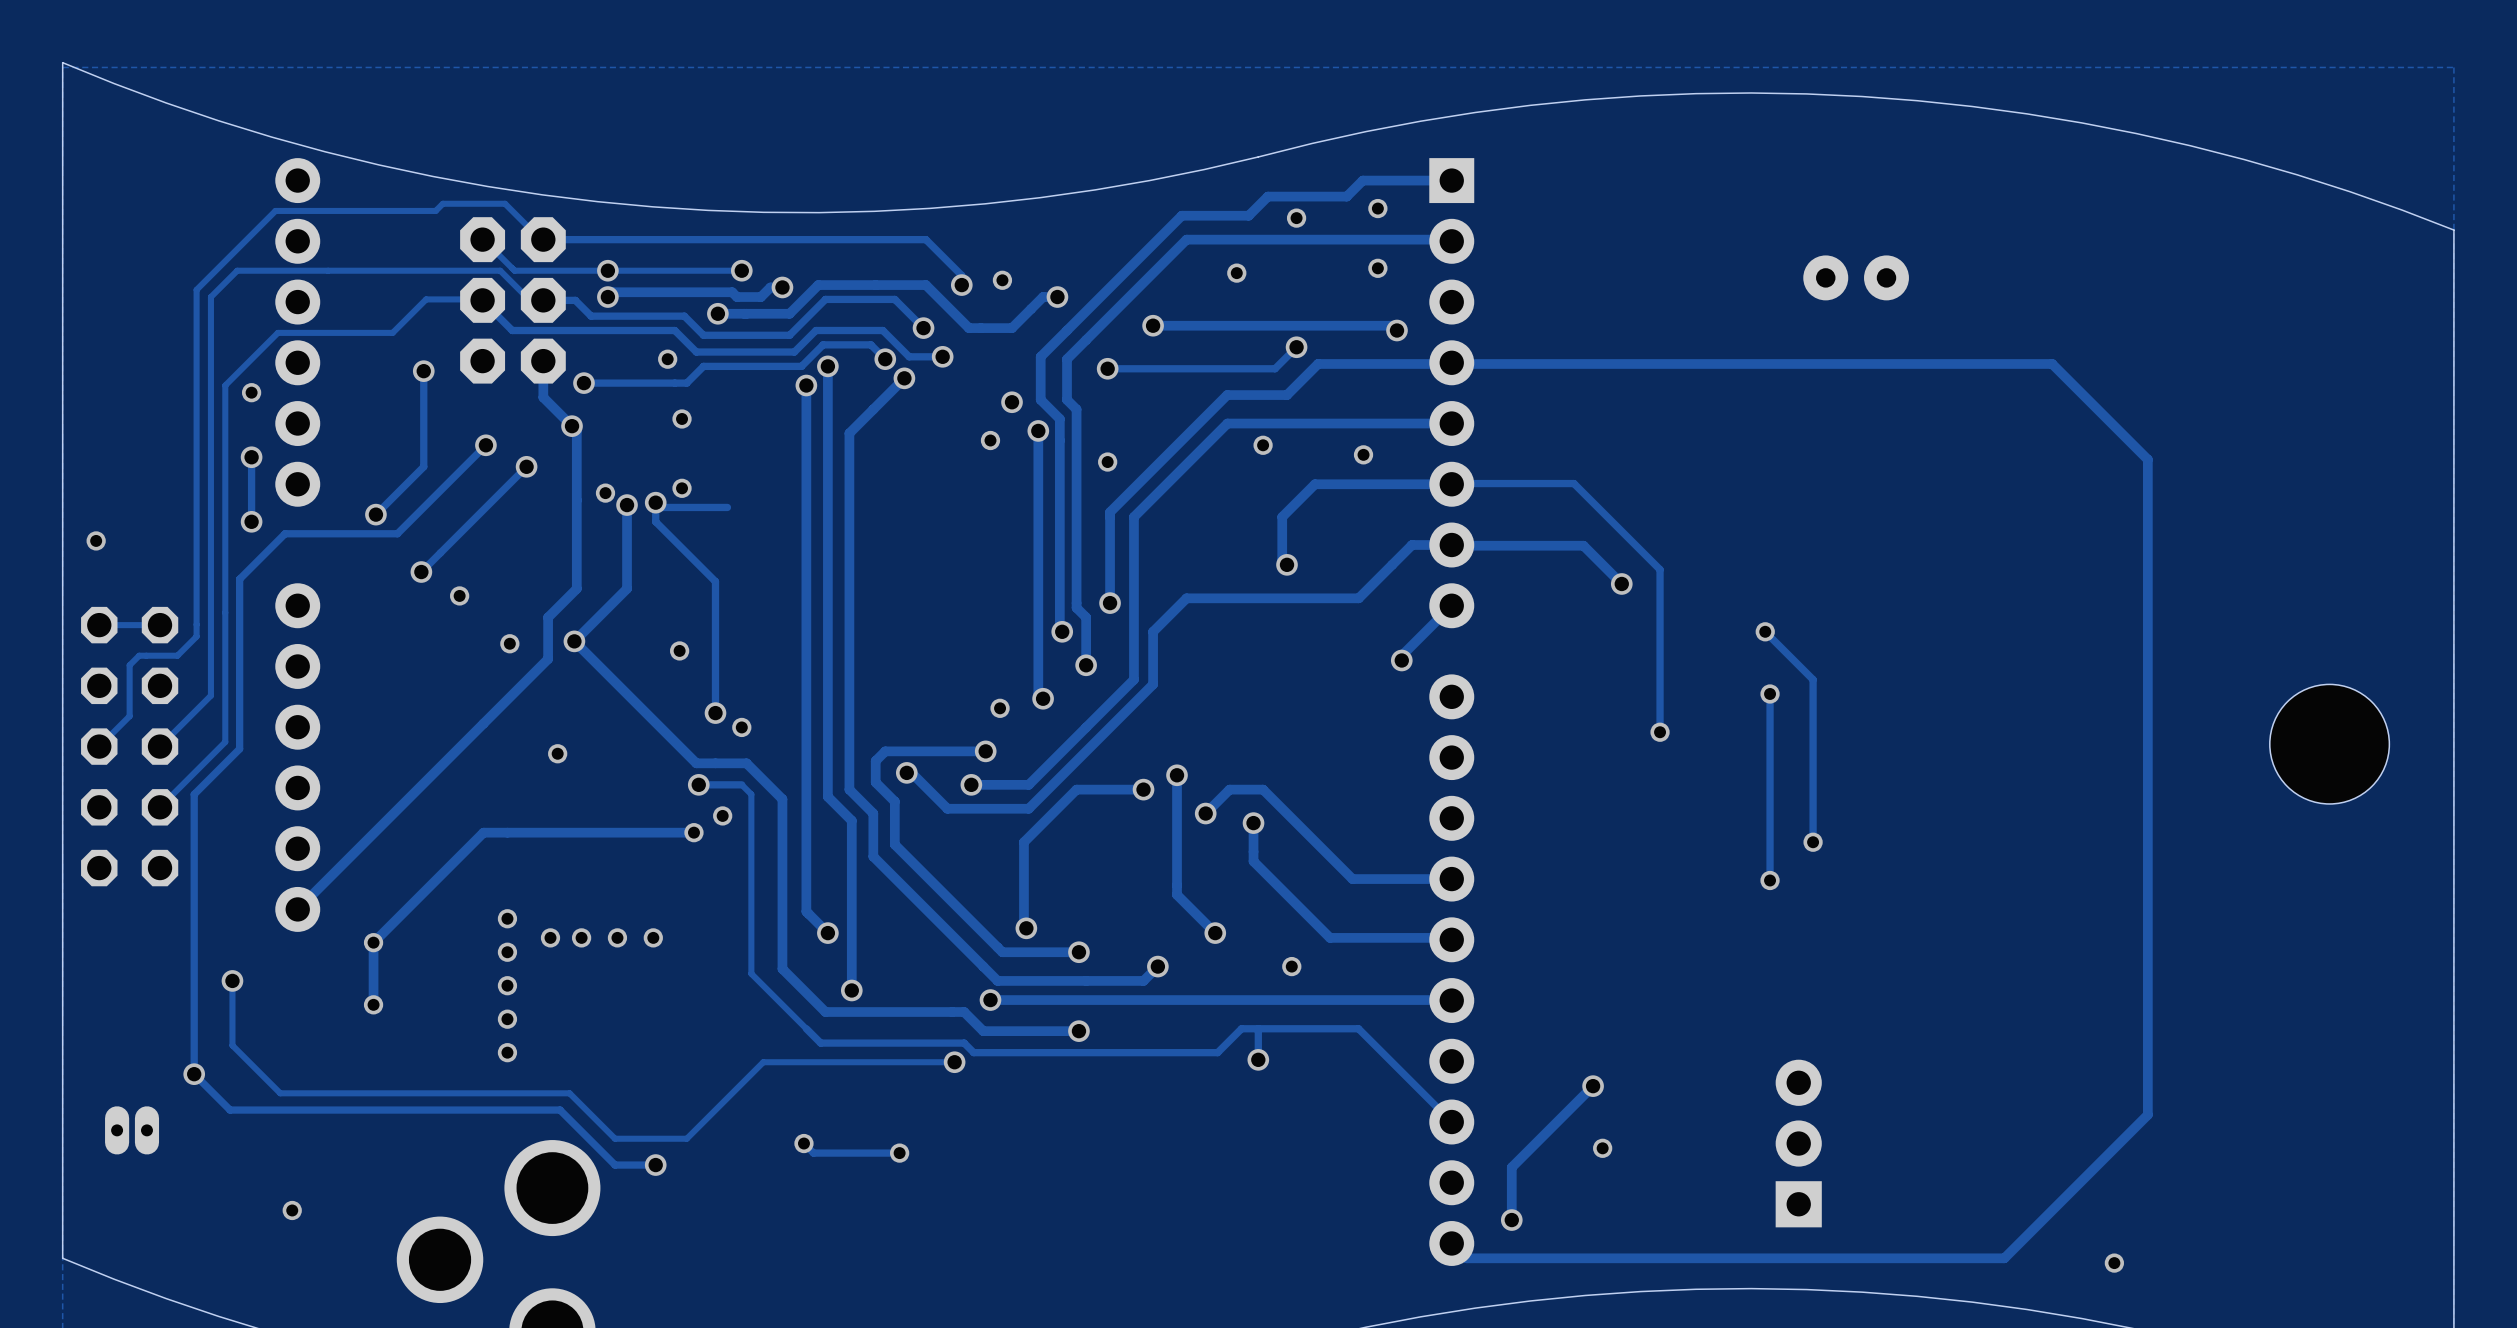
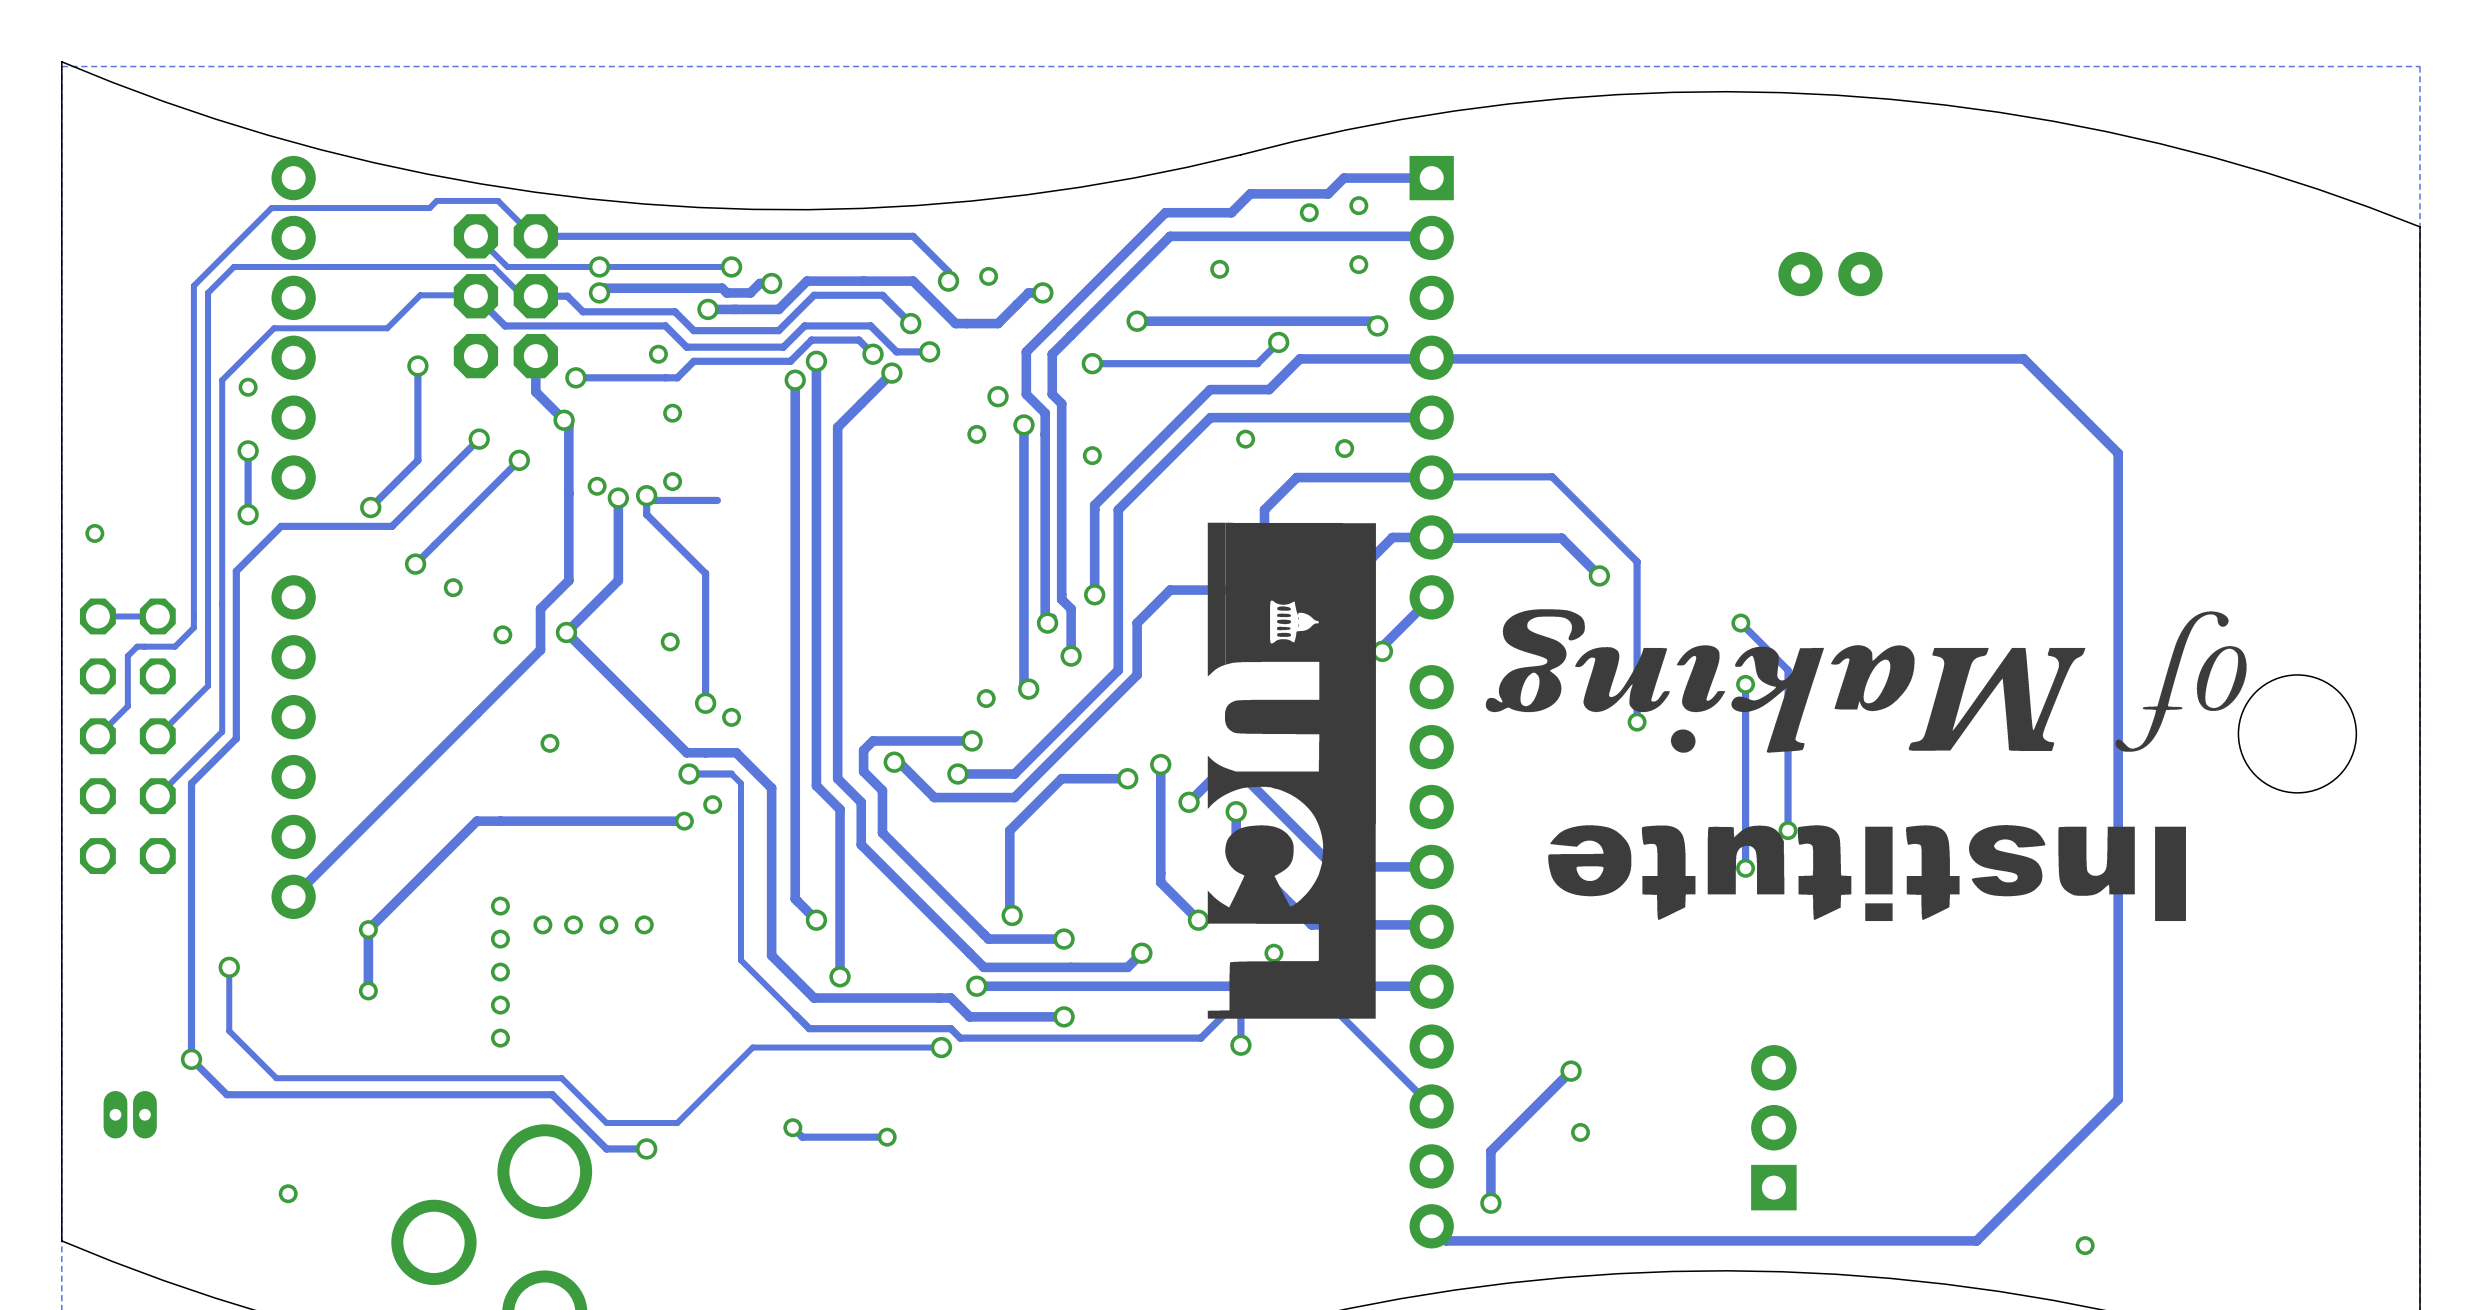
via position: (1296, 218) -> (1309, 212)
drawing: none -> [1207, 522, 2247, 1019]

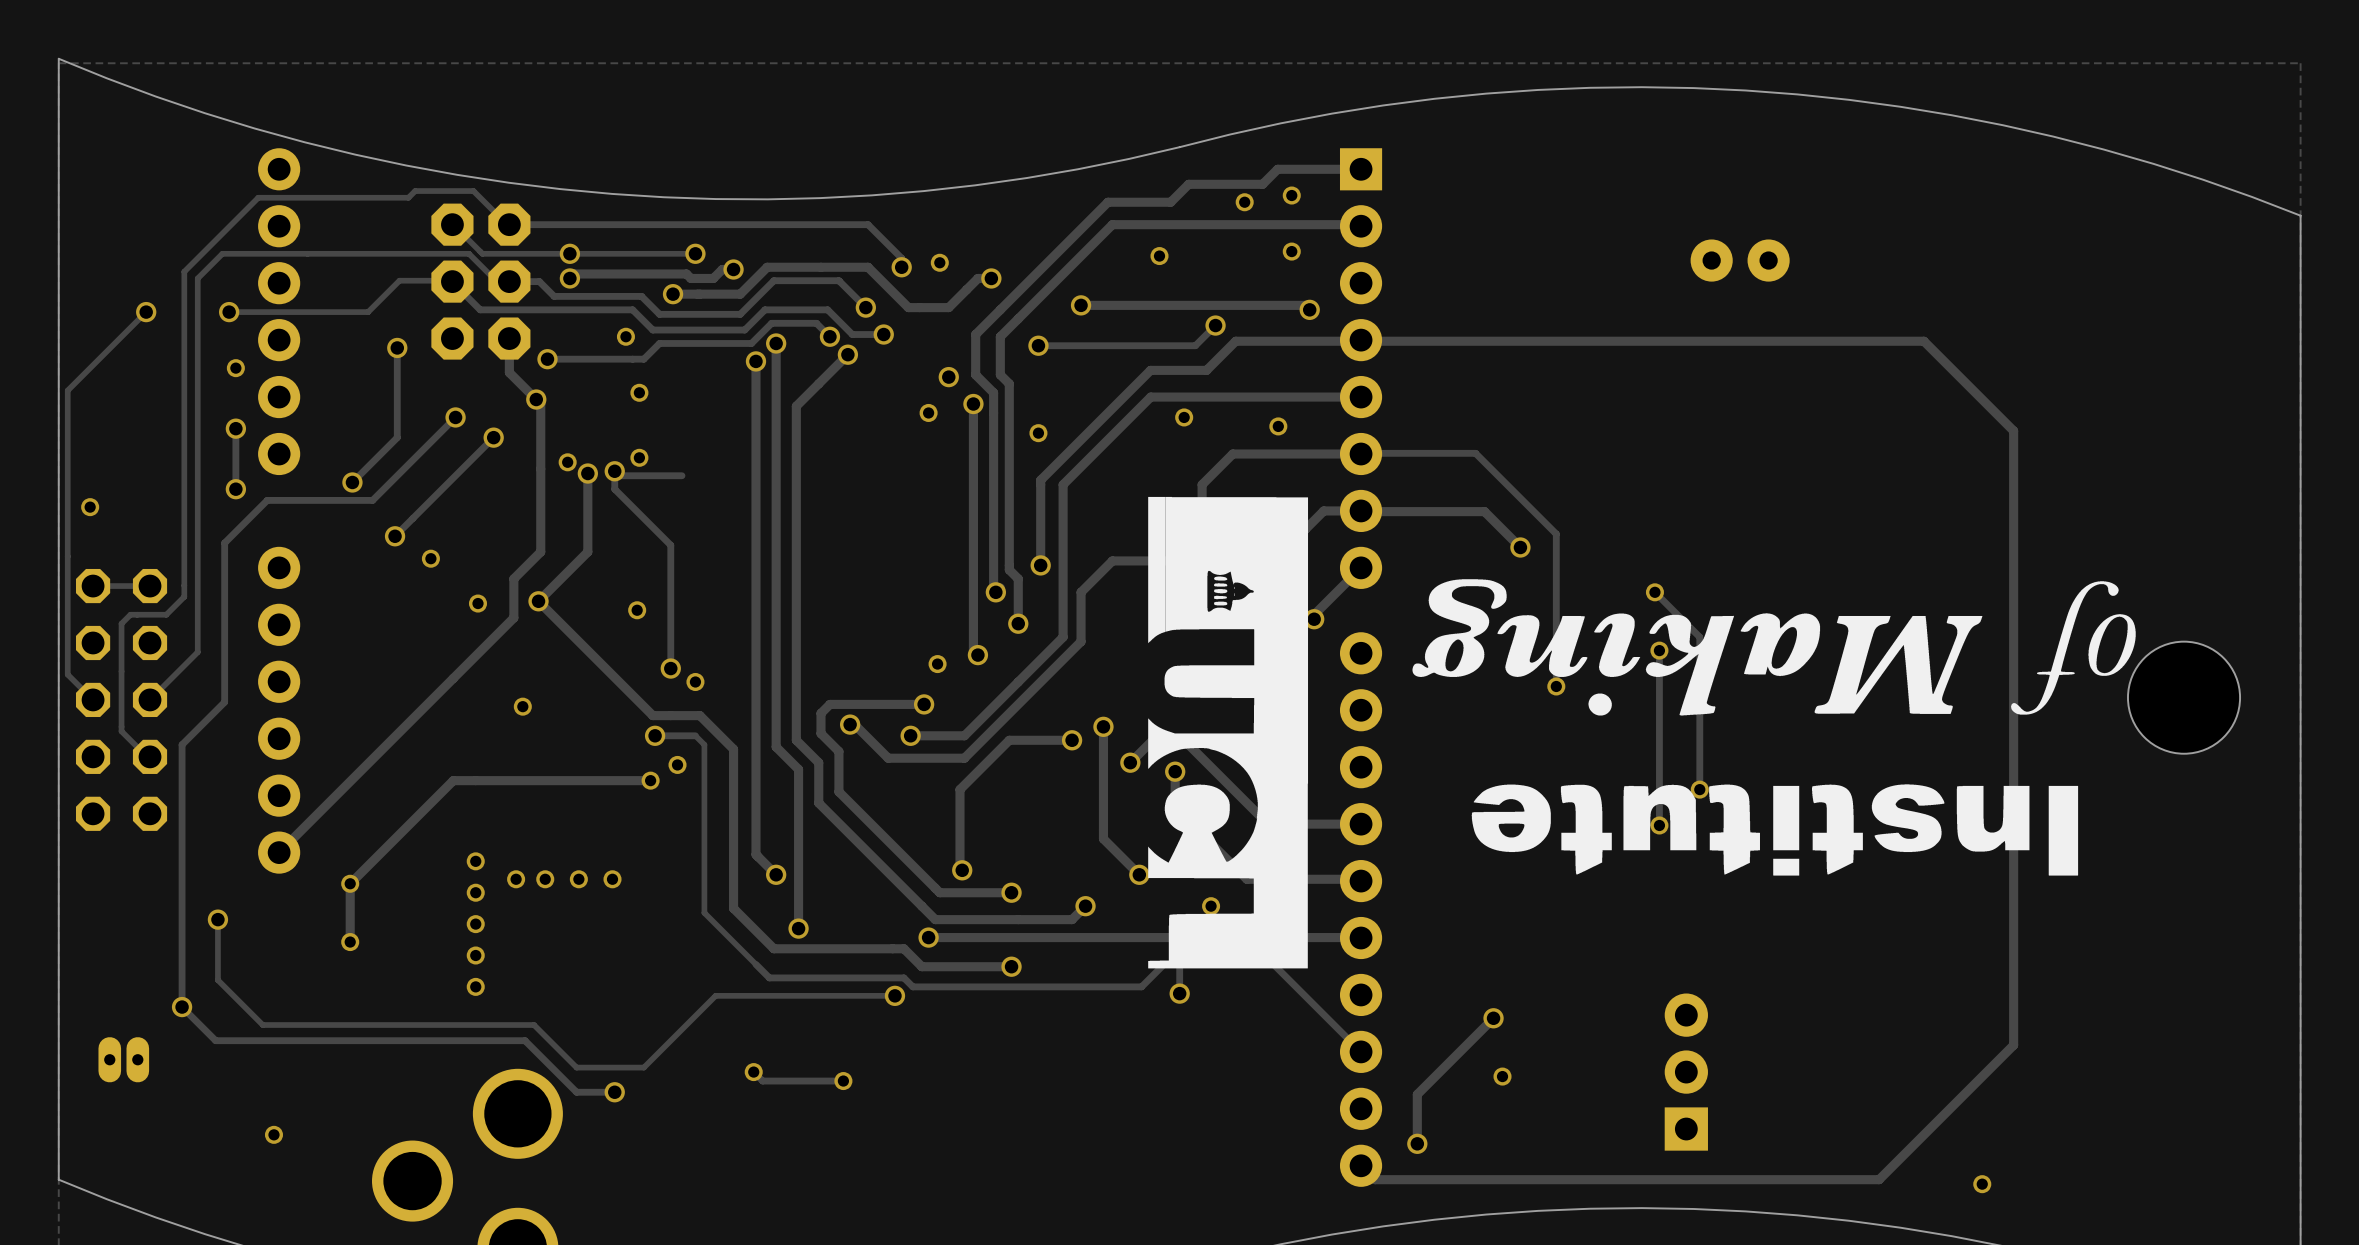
track: none -> (146, 312) (67, 390) (67, 674) (93, 699)
via: none -> (146, 312)
via: none -> (229, 312)
track: (274, 328) (222, 380) (222, 731) (157, 796) -> (260, 312) (229, 312)
track: (127, 706) (97, 736) -> (121, 671) (121, 731) (148, 758)

